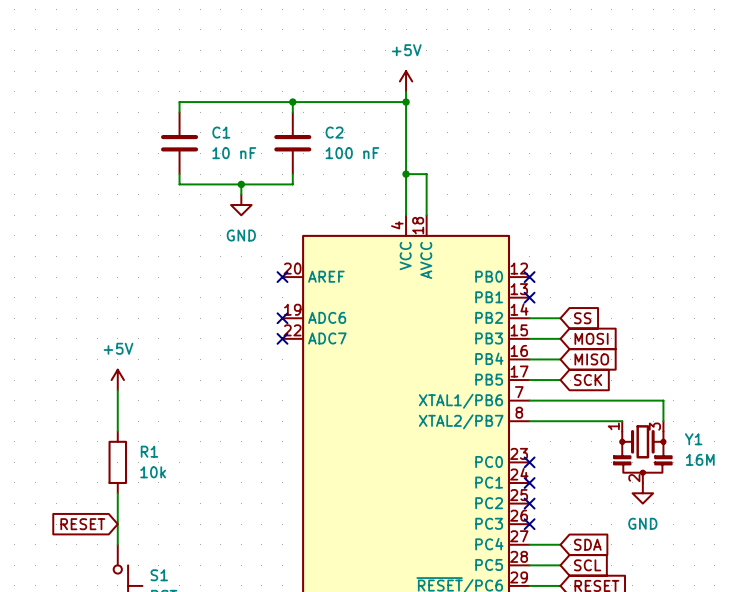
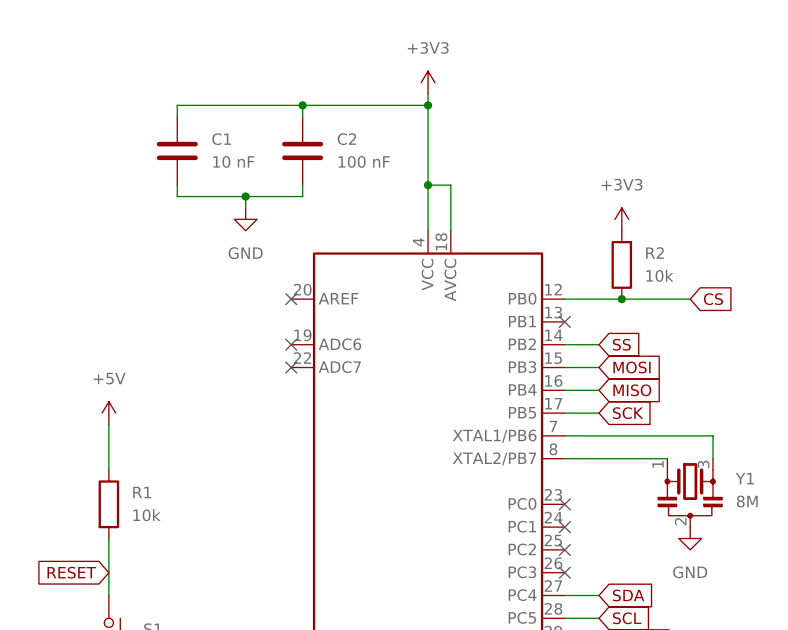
power symbol: +5V (406, 81) -> +3V3 (428, 82)
power symbol: none -> +3V3 (621, 219)
R2: none -> 10k (621, 264)
wire: none -> (564, 299) (690, 299)
no-connect mark: (529, 277) -> none
junction: none -> (621, 299)
global label: none -> CS (713, 299)
Y1 value: 16M (700, 459) -> 8M (747, 501)

